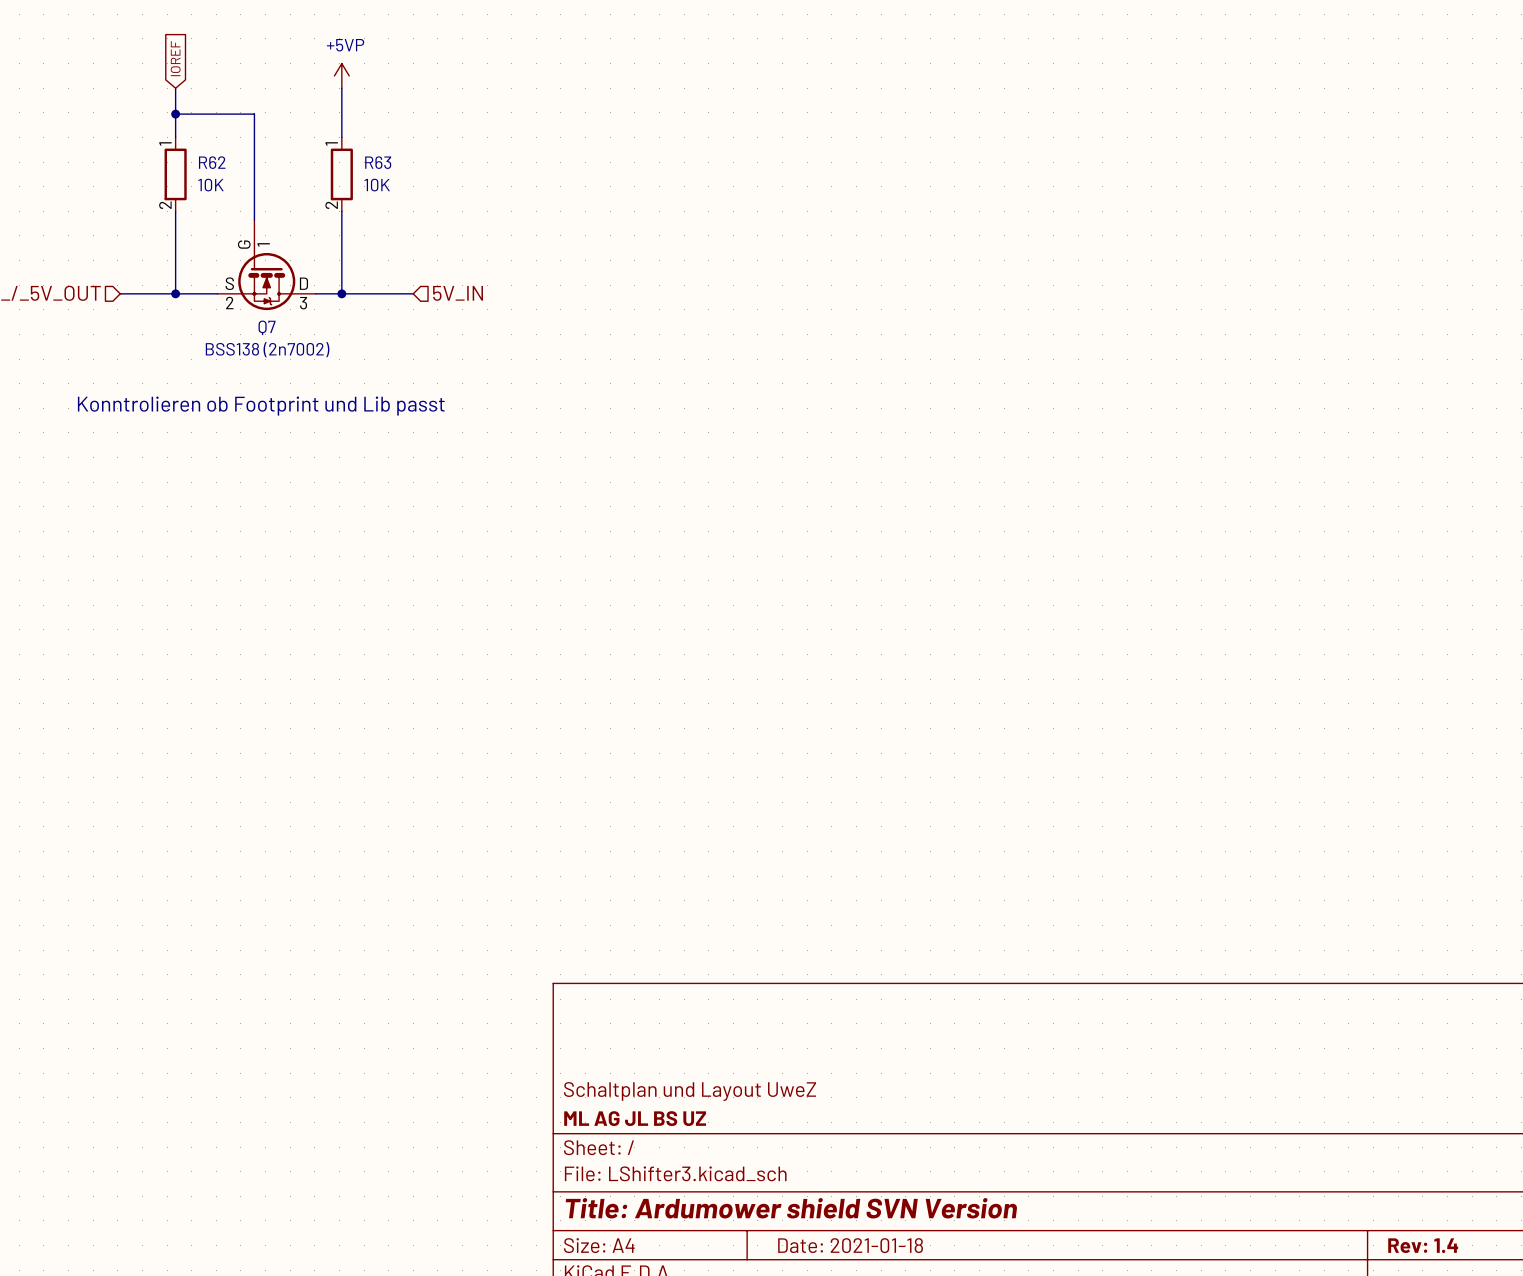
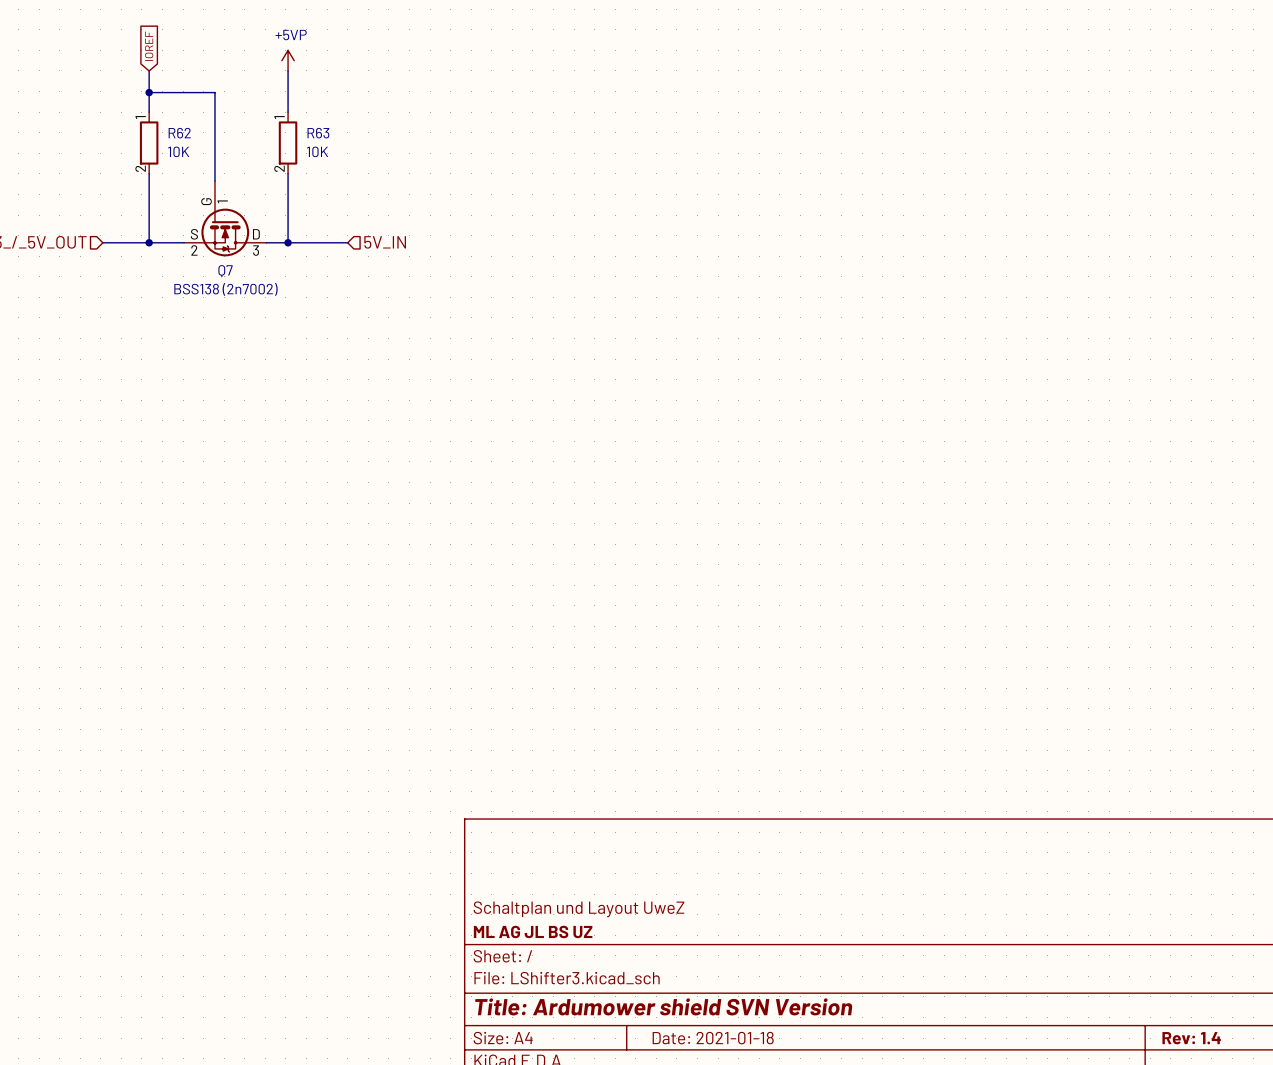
text: Konntrolieren ob Footprint und Lib passt (261, 406) -> none

